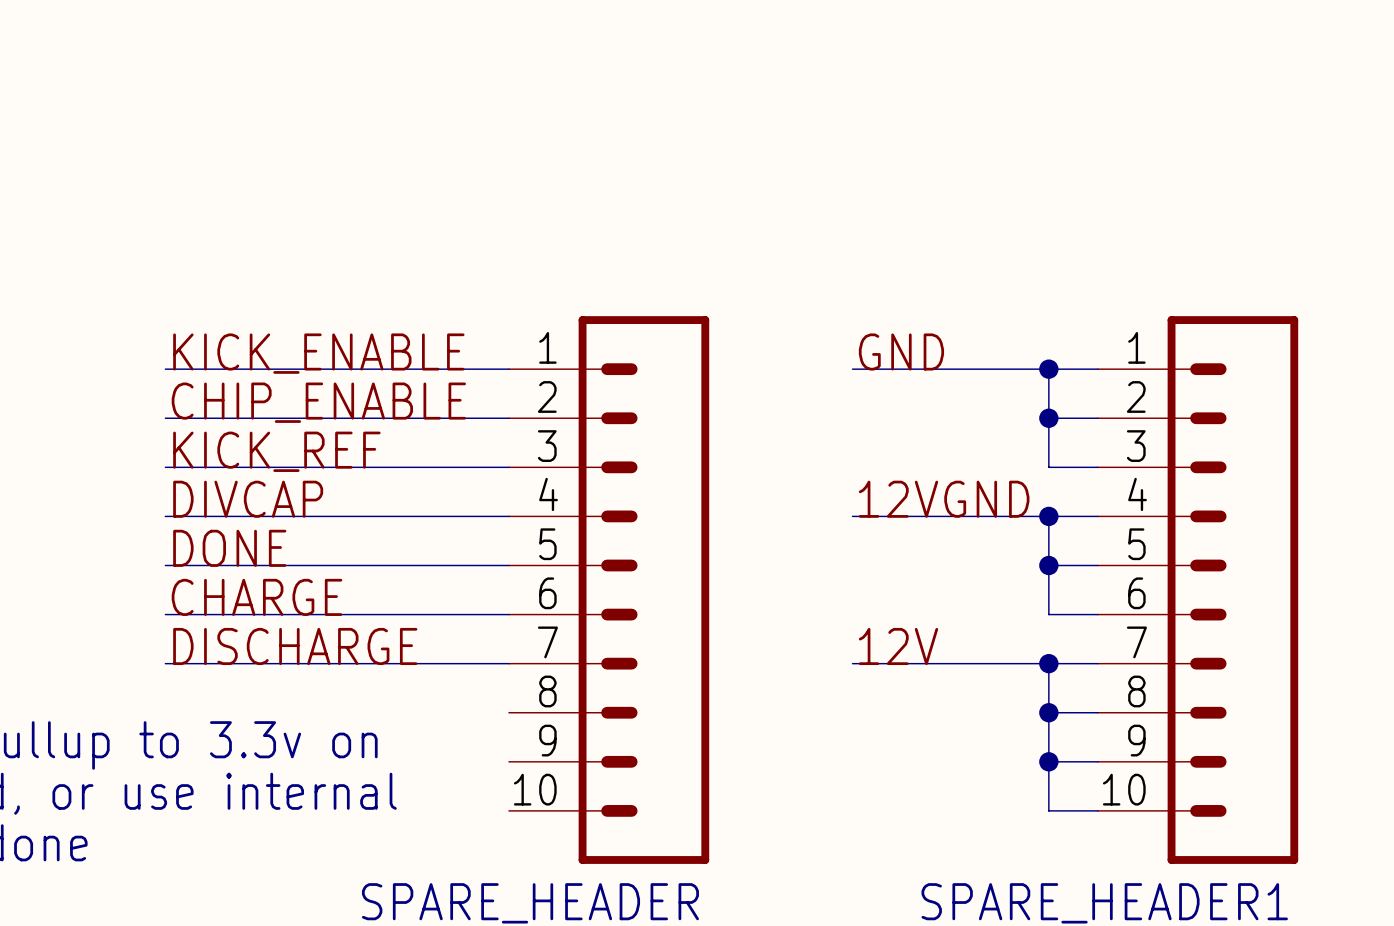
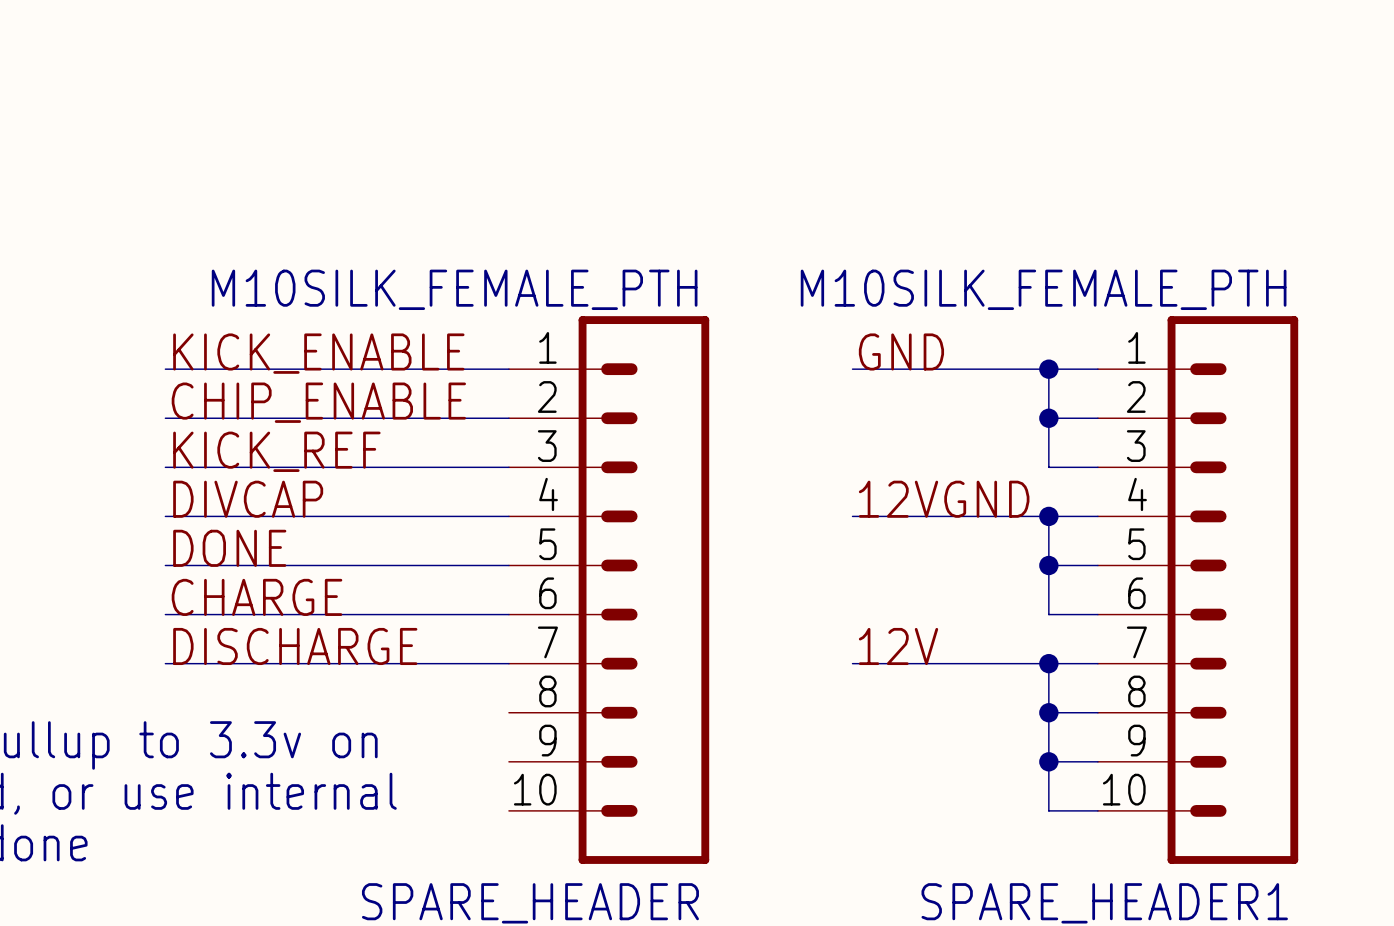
SPARE_HEADER value: none -> M10SILK_FEMALE_PTH (454, 289)
SPARE_HEADER1 value: none -> M10SILK_FEMALE_PTH (1043, 289)

